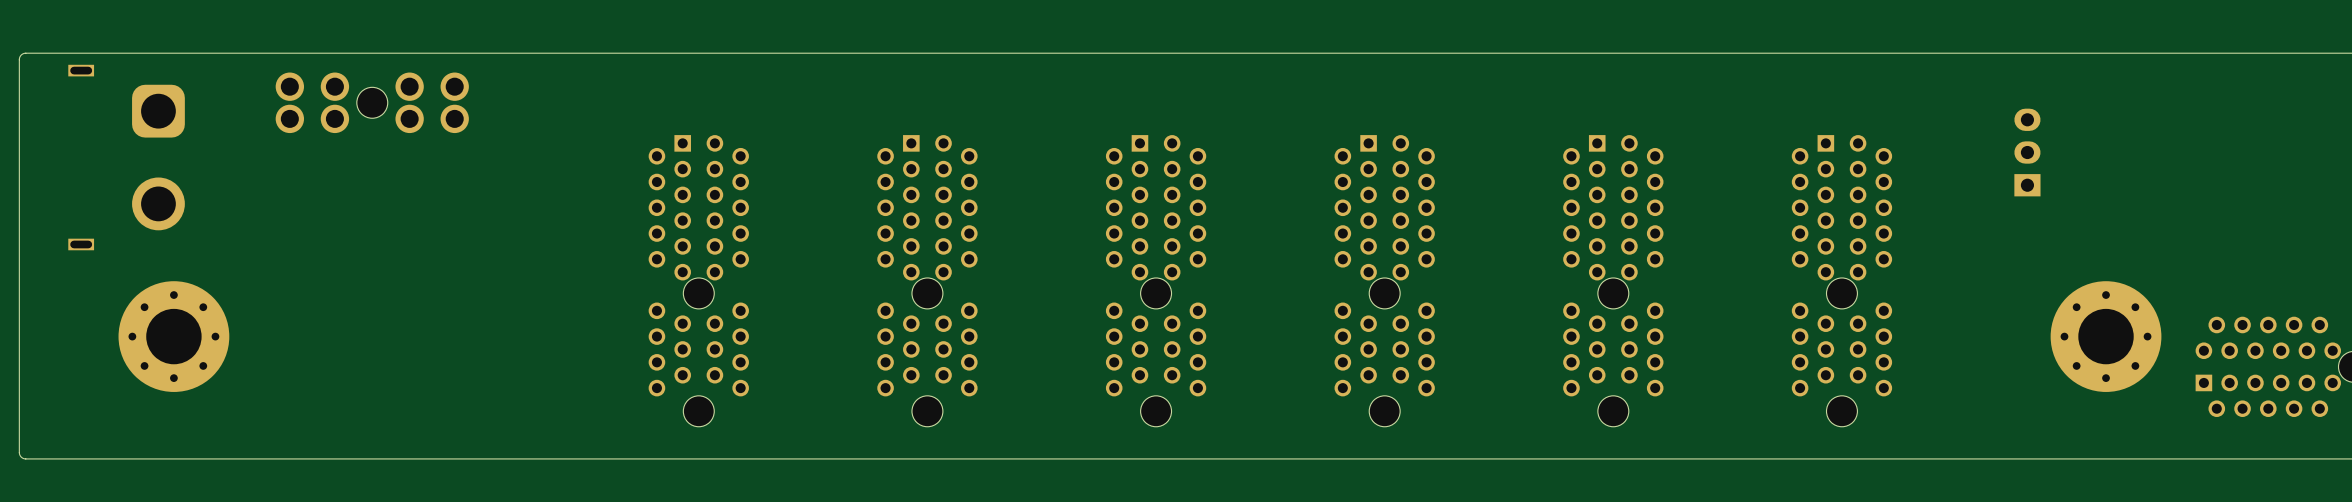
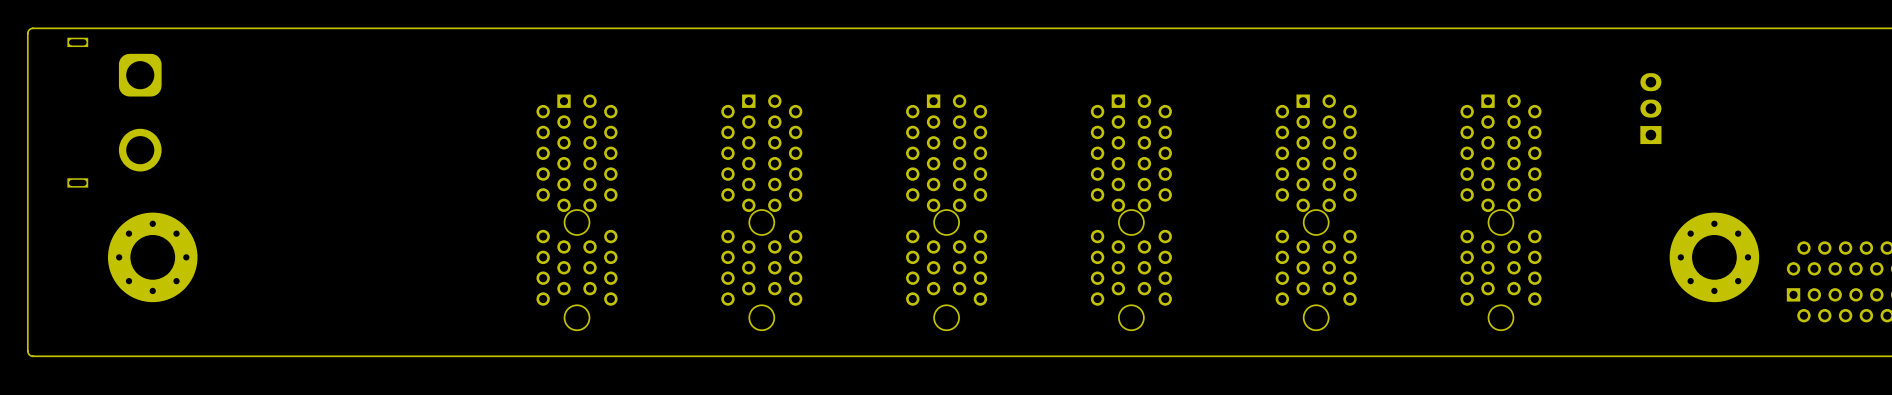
part: (372, 102) -> none

